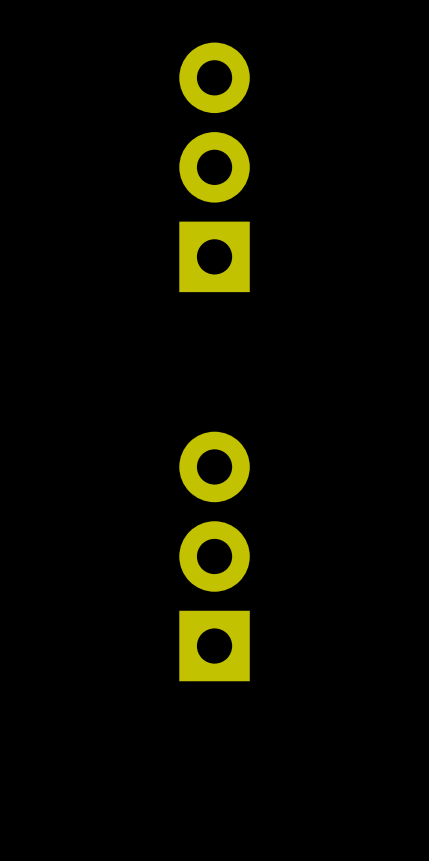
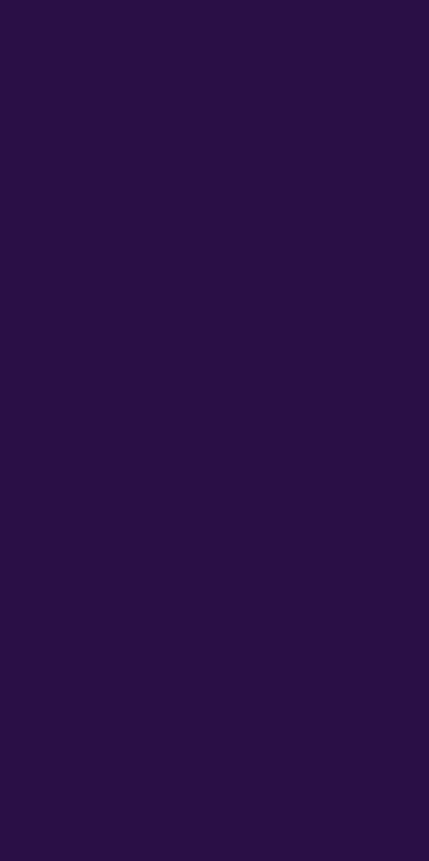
part: (214, 167) -> none
part: (214, 556) -> none

